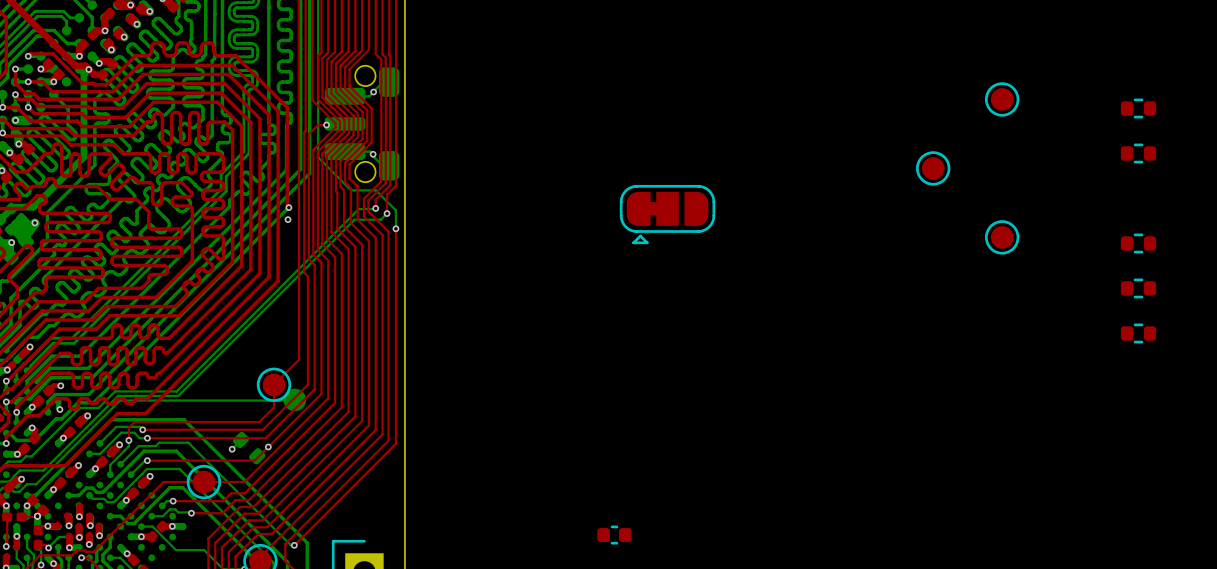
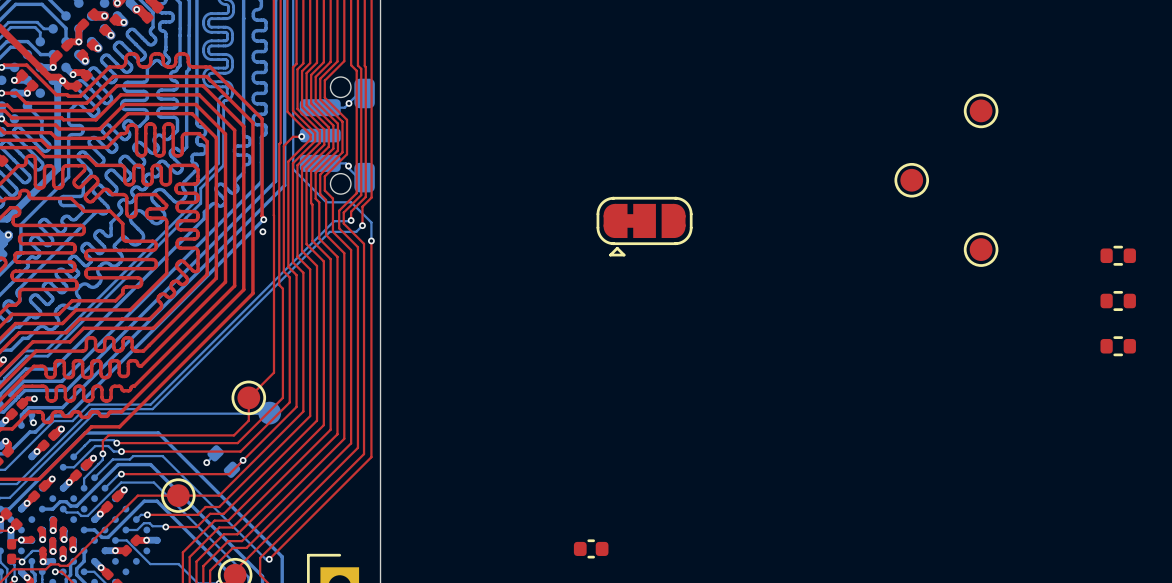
part: (1138, 108) -> none
part: (1138, 153) -> none

